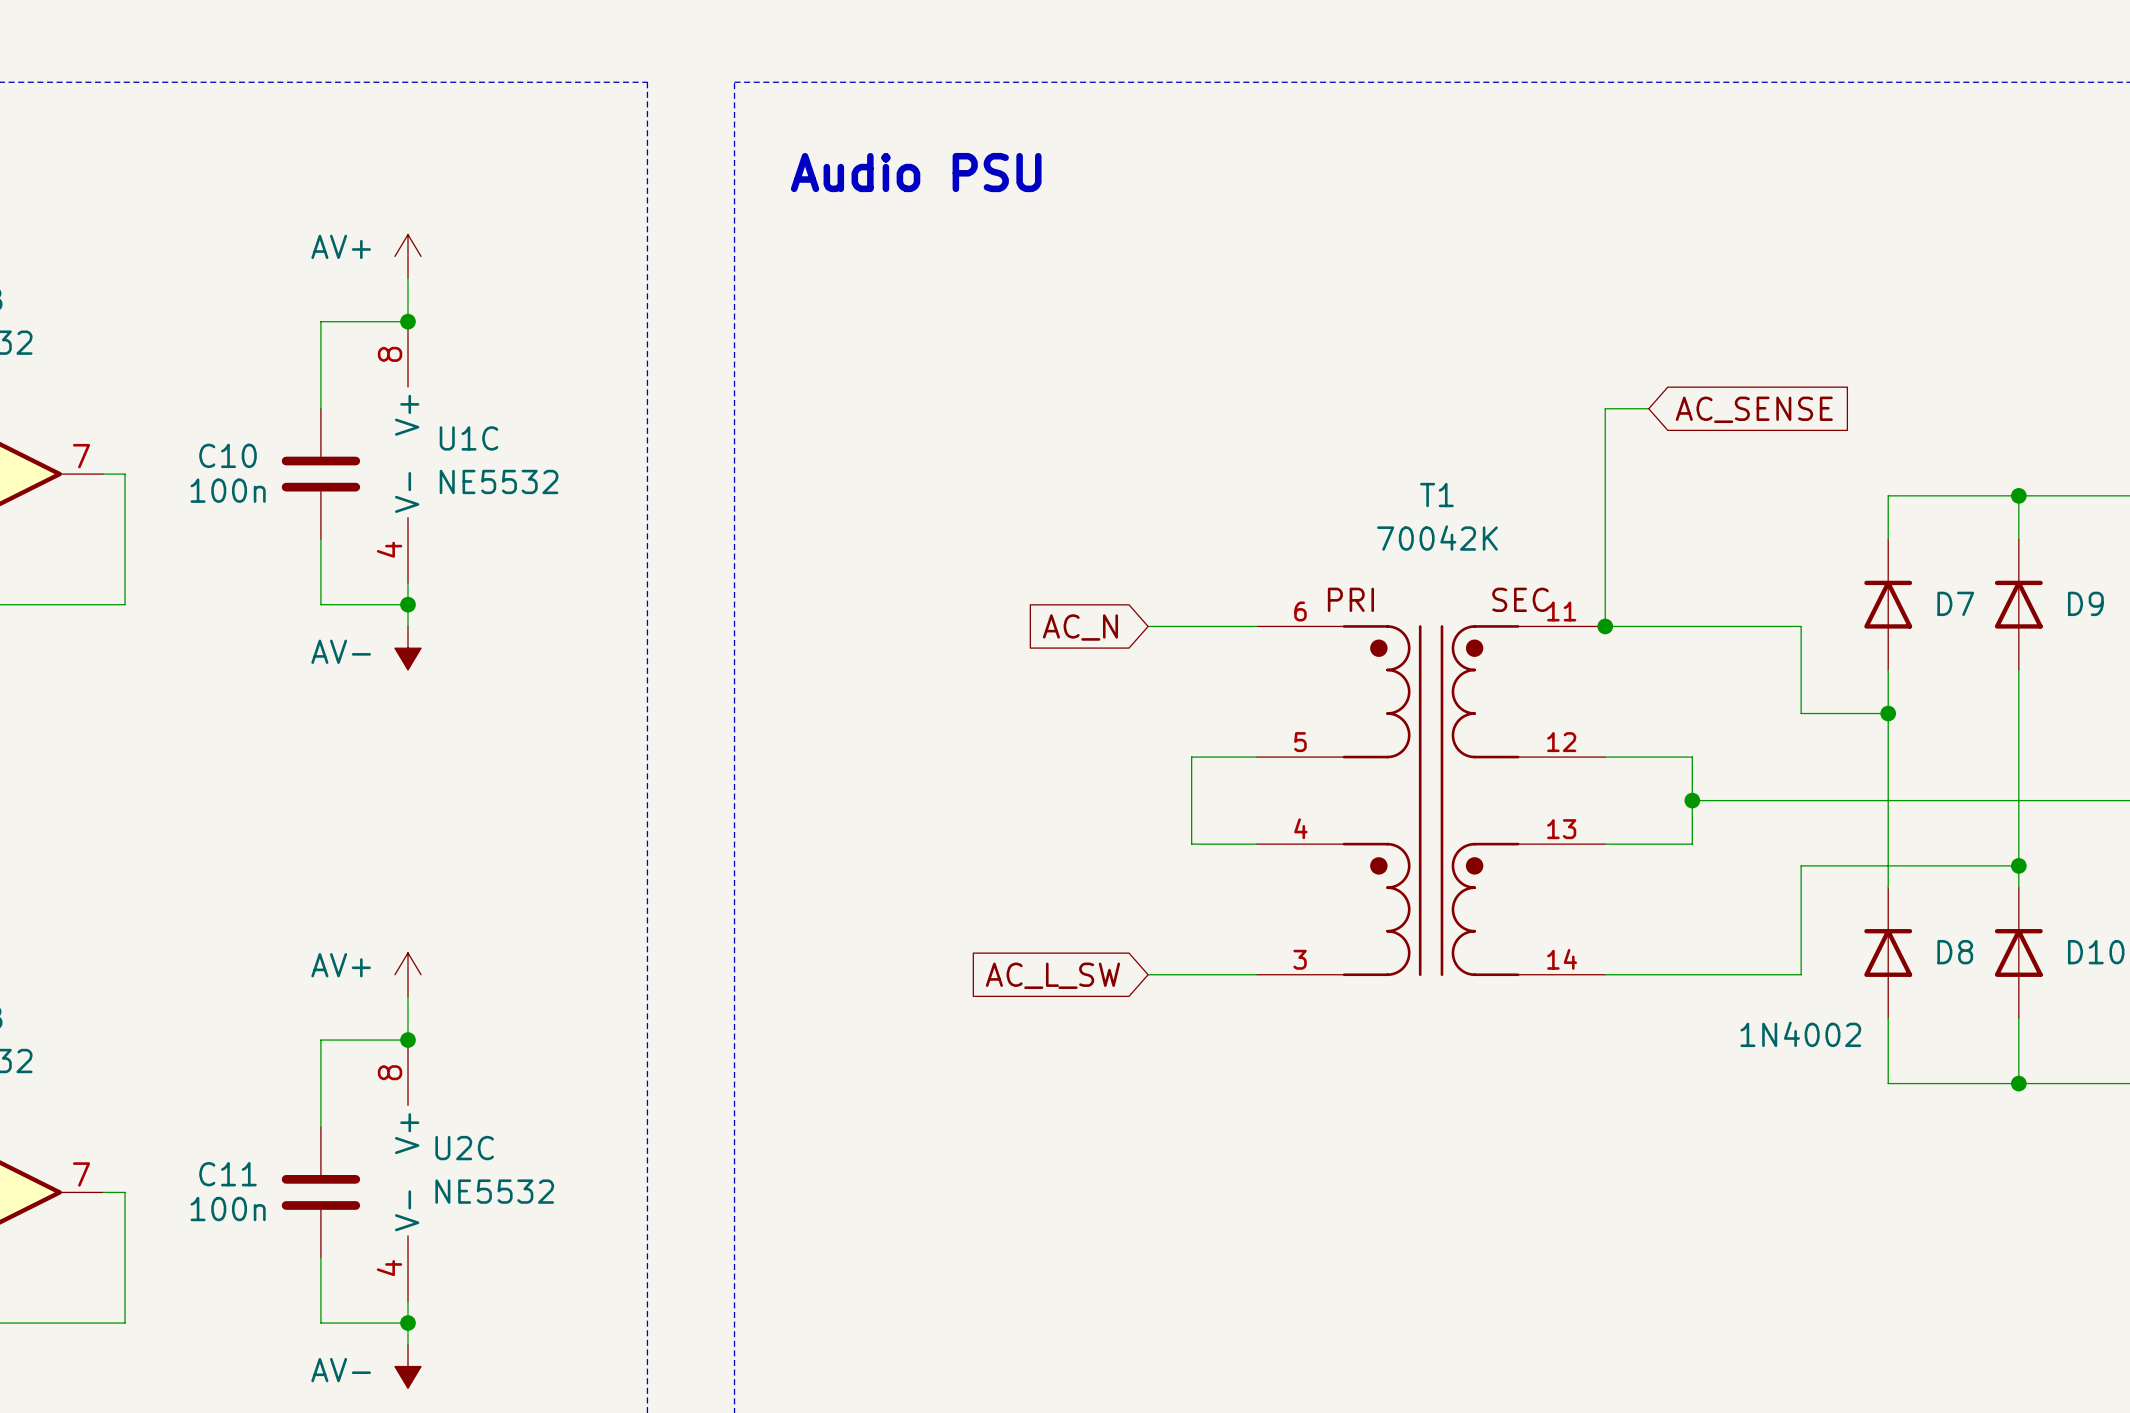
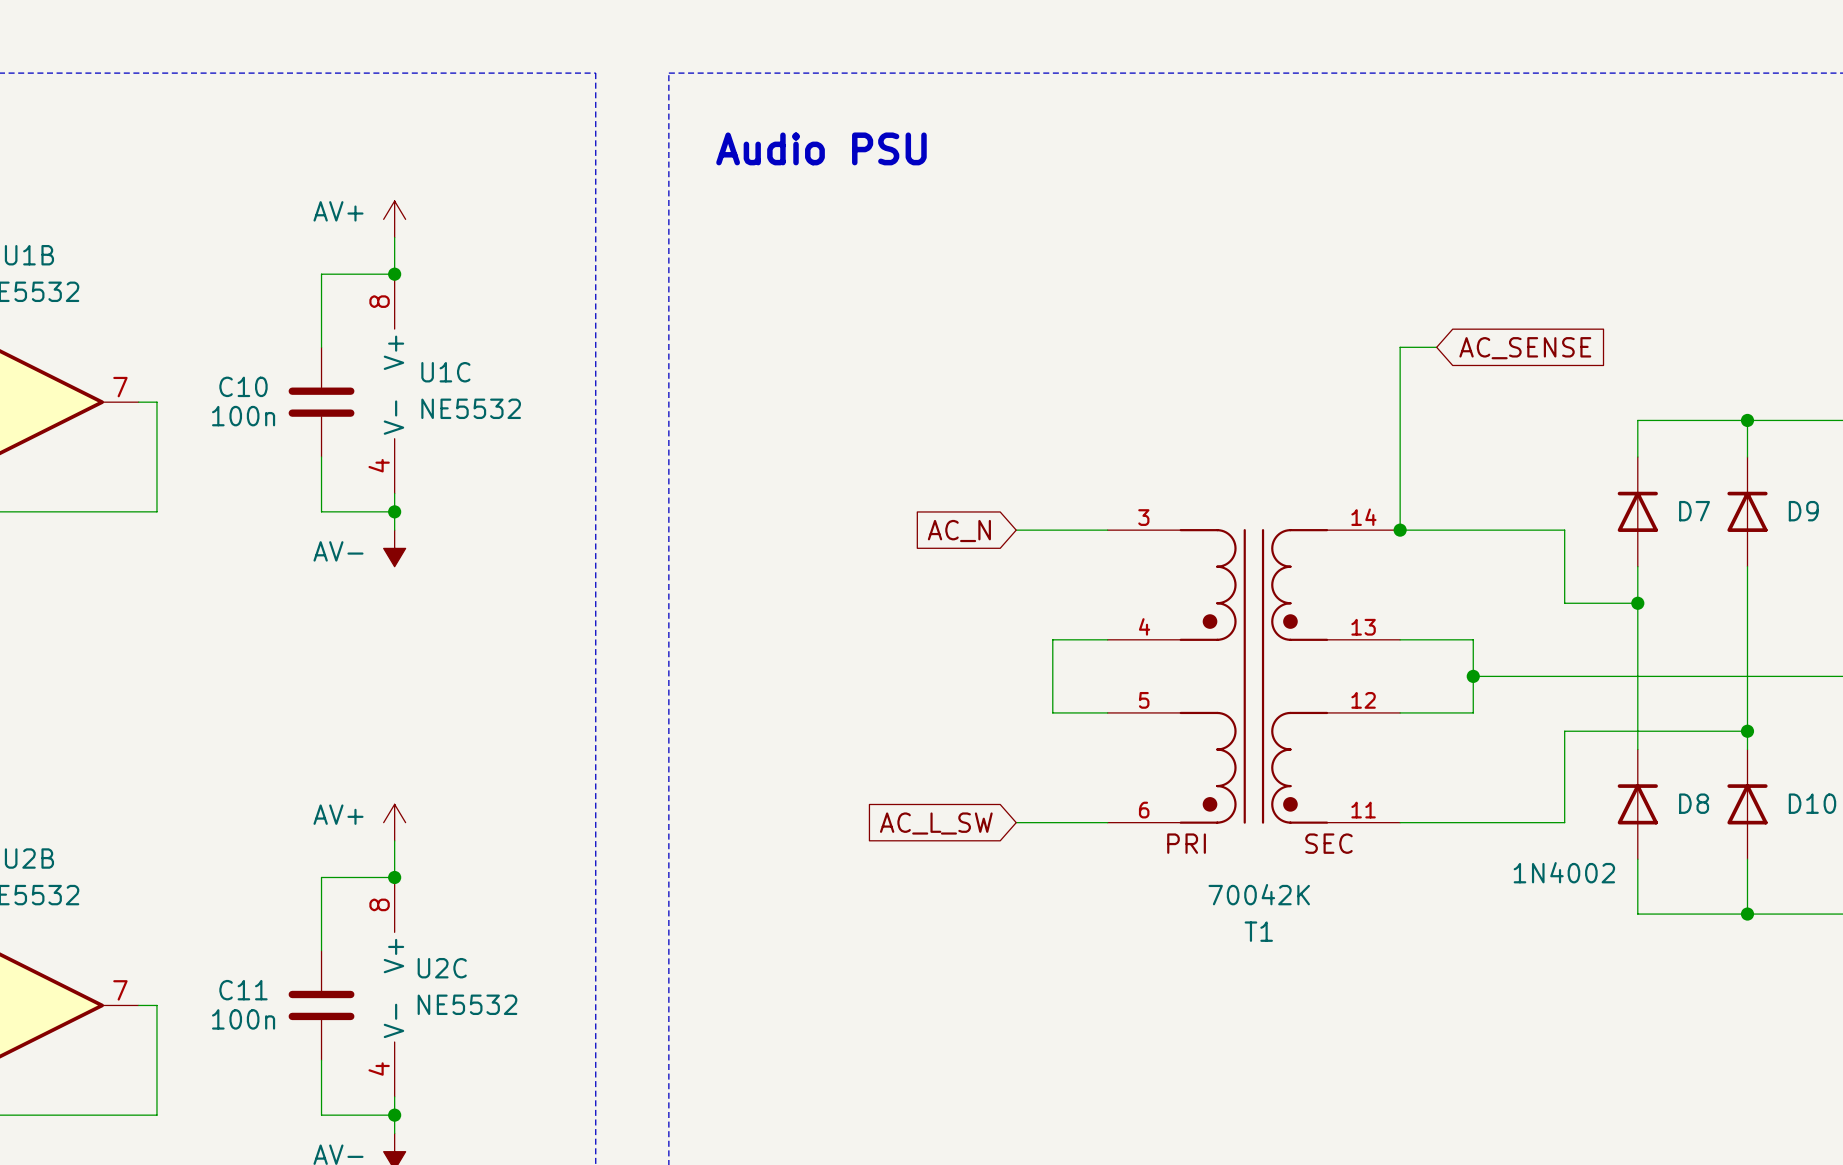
T1 flip: as is (1431, 800) -> up-down (1253, 676)

